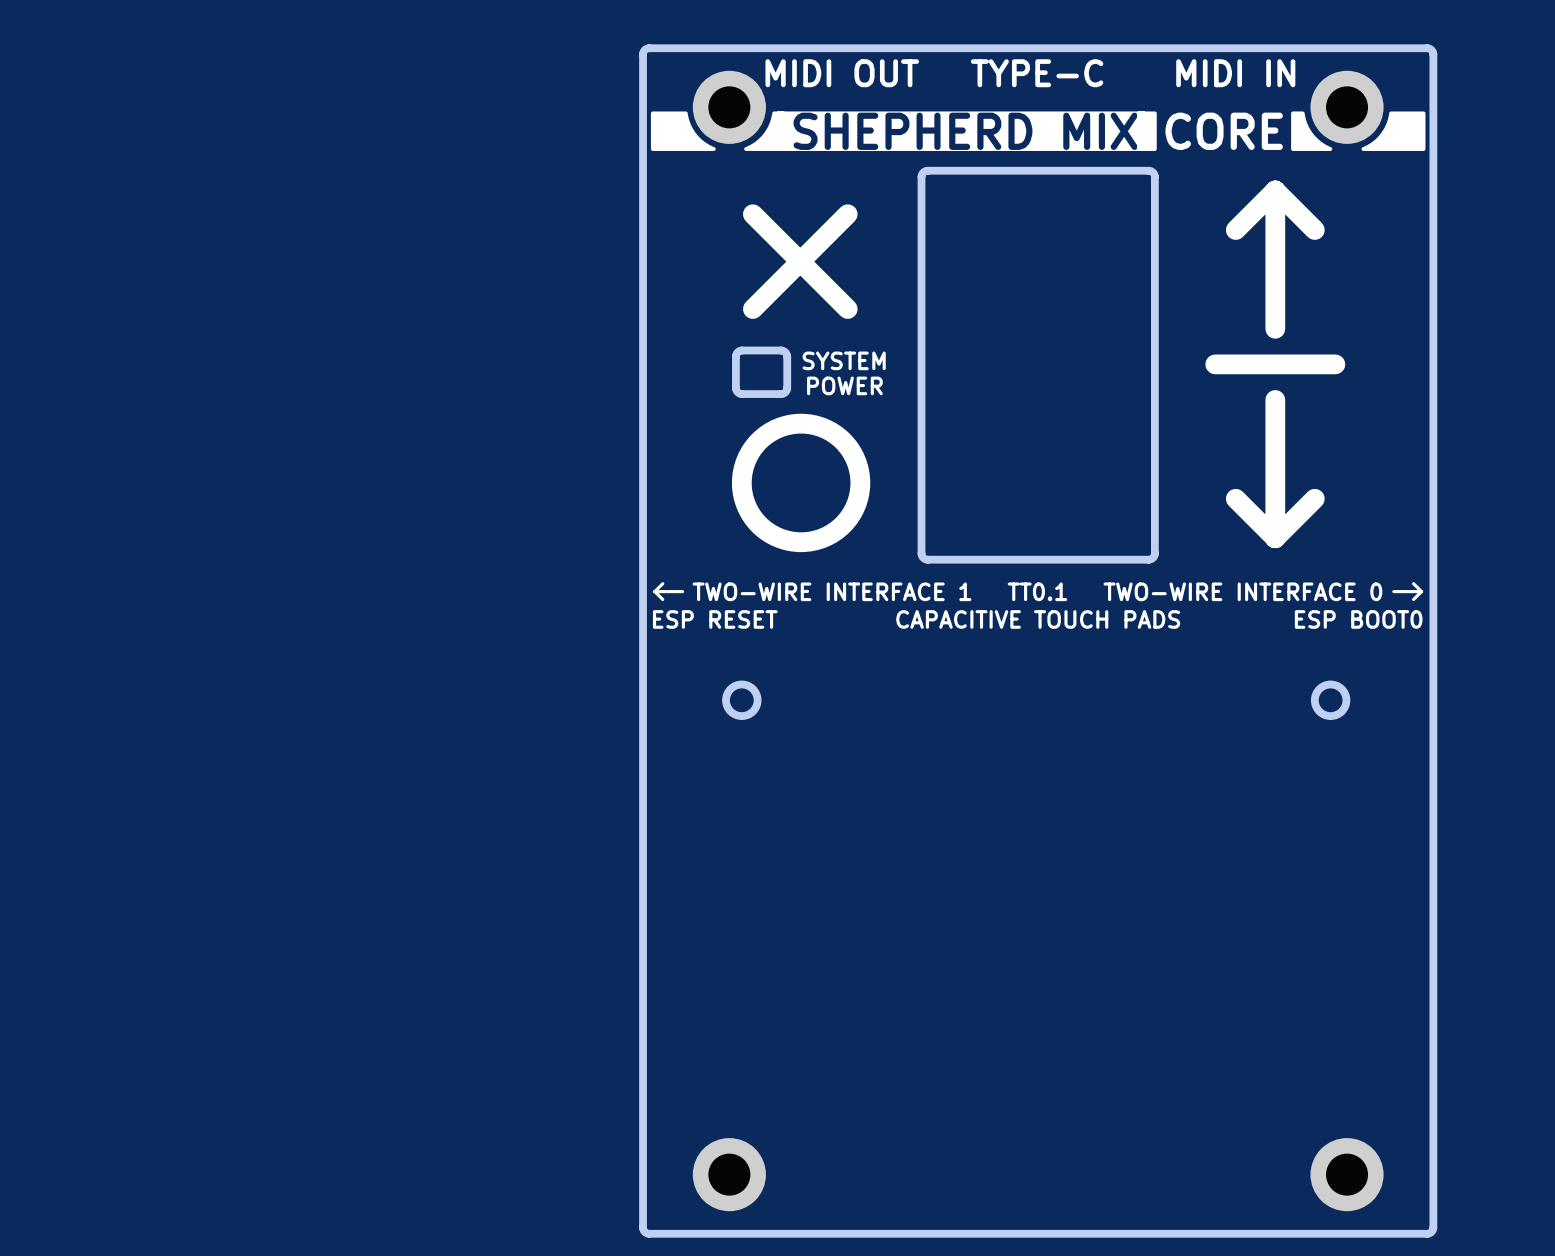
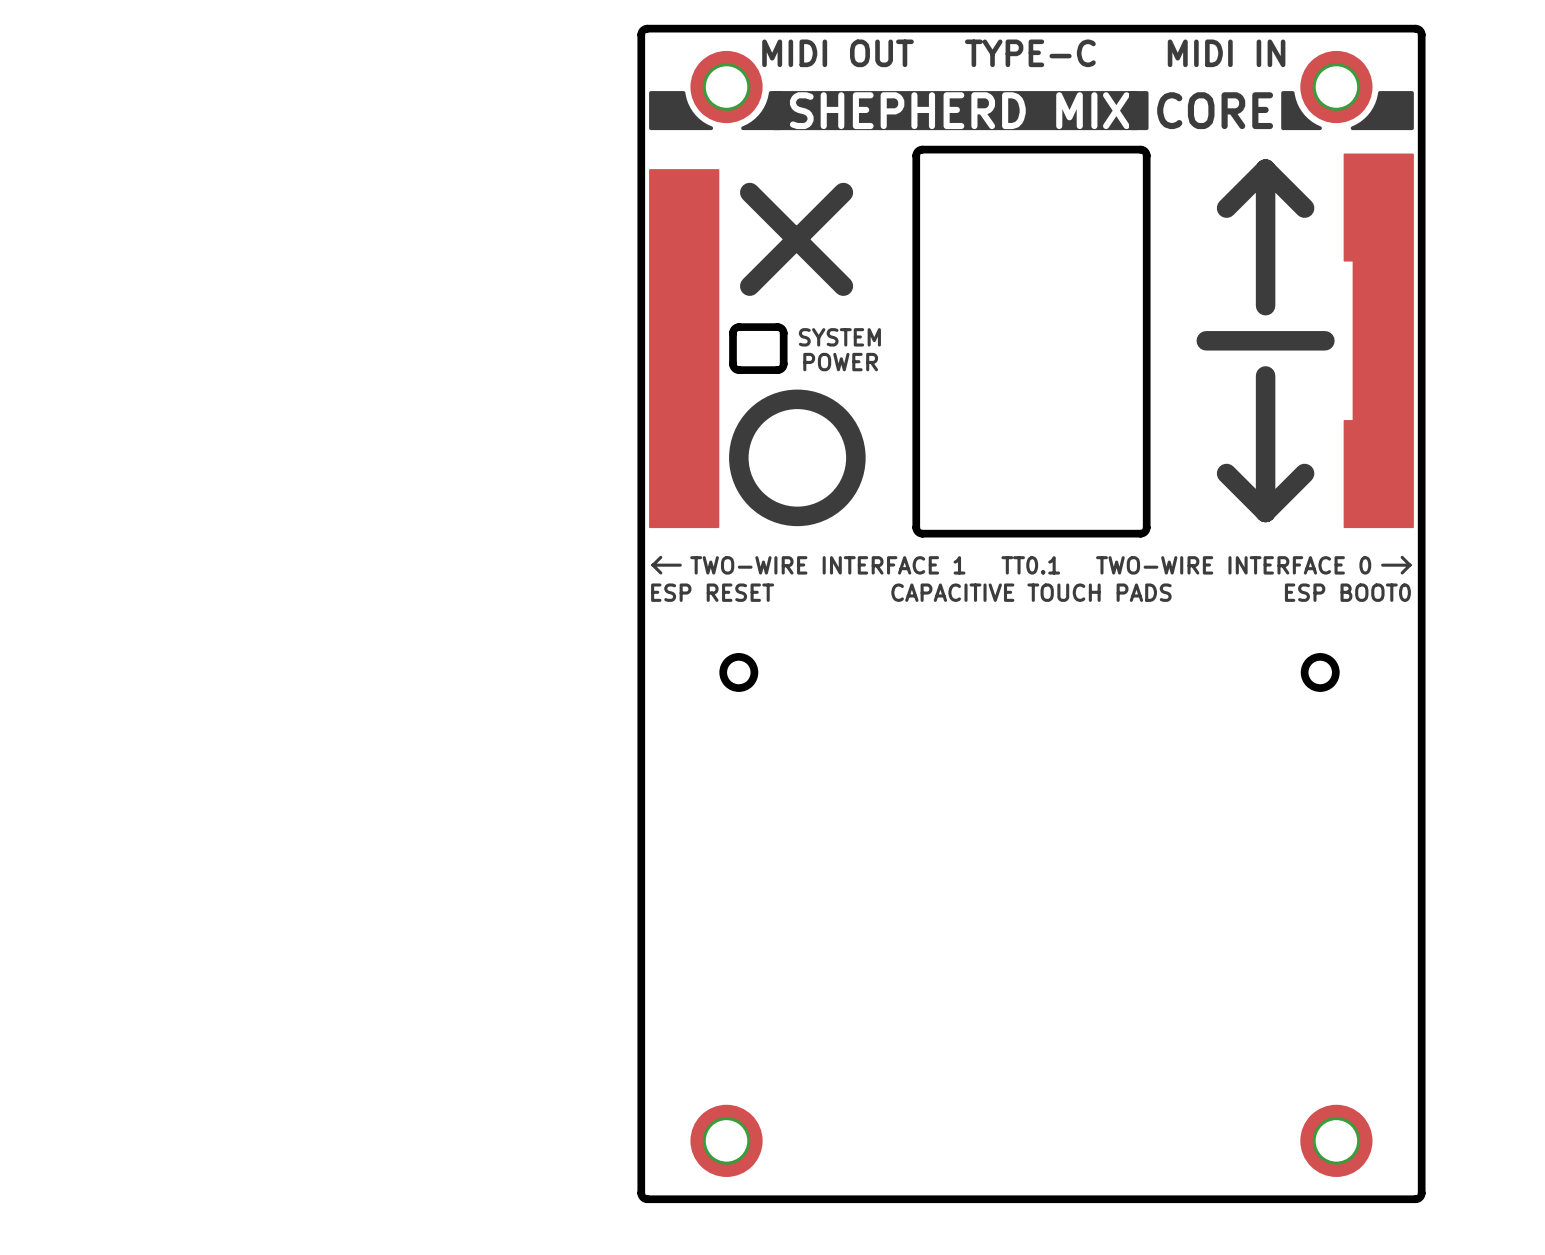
drawing: none -> [1343, 153, 1414, 529]
drawing: none -> [649, 169, 720, 529]

